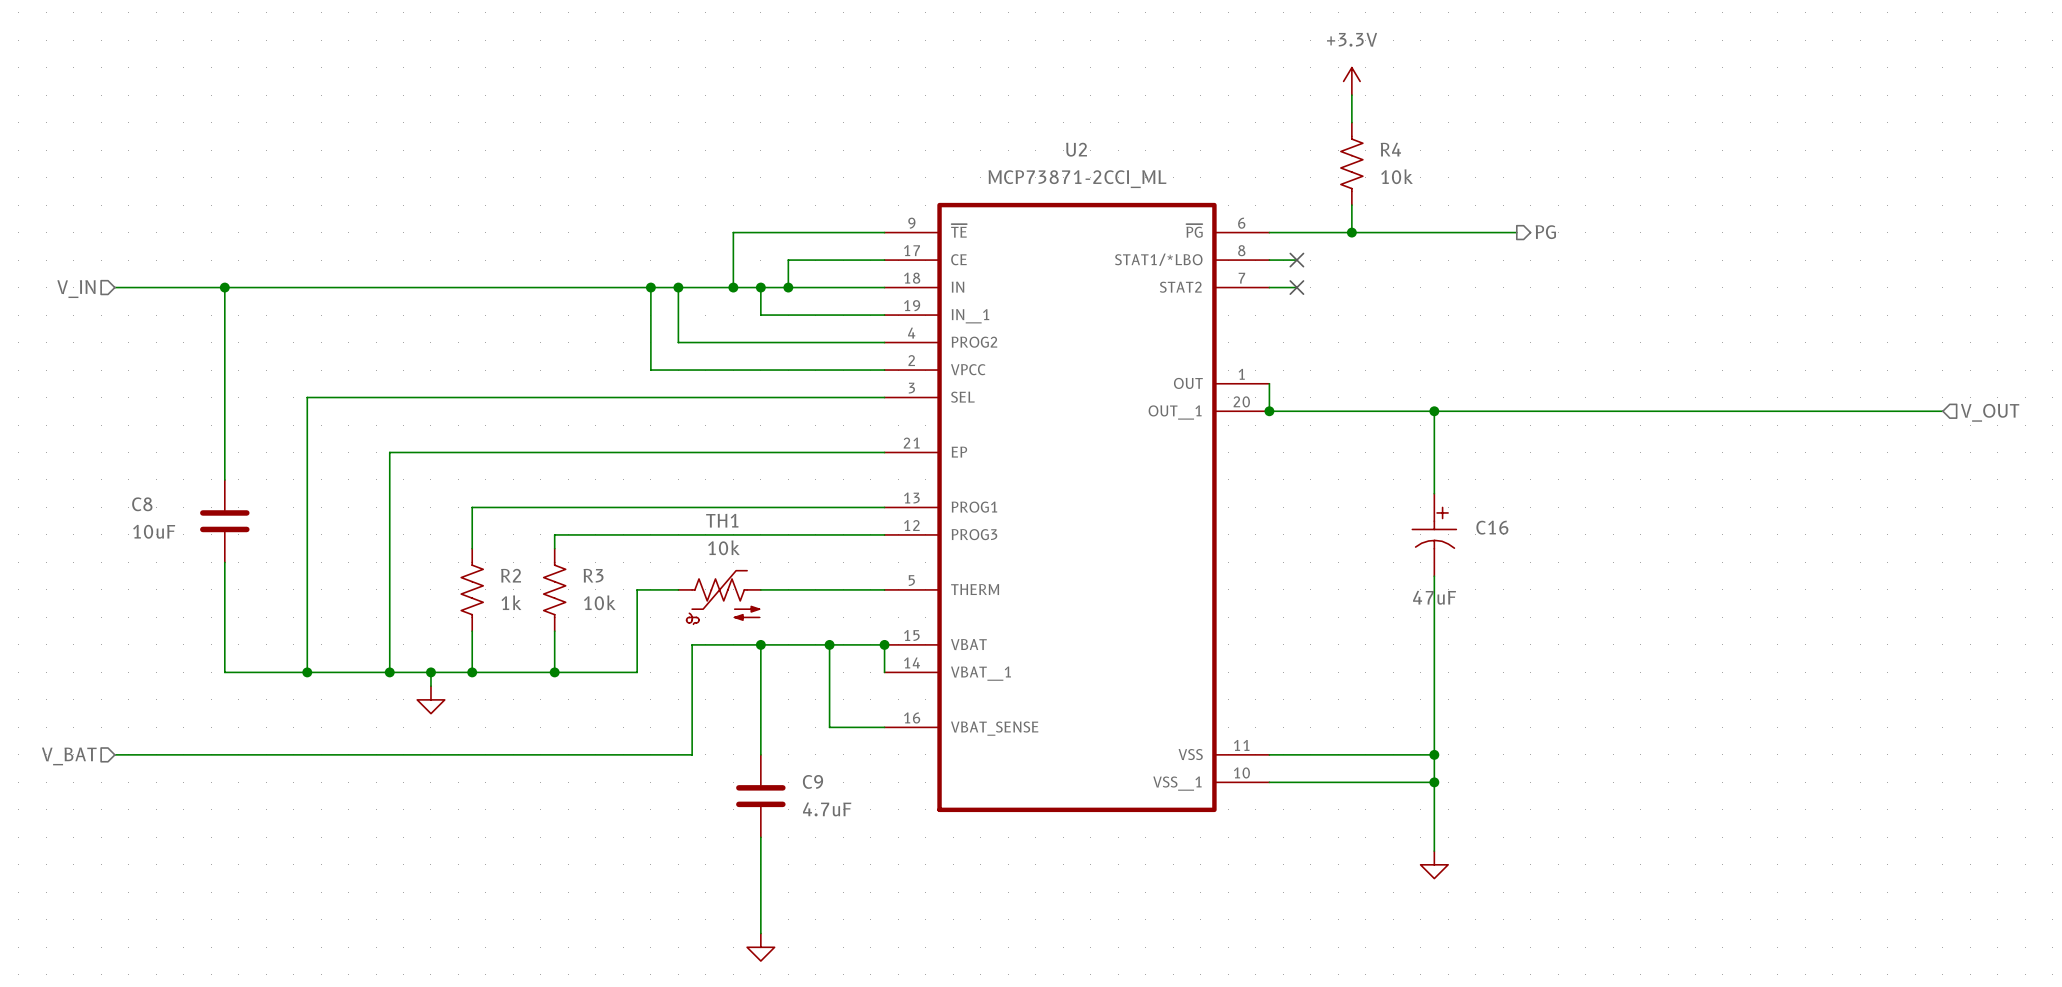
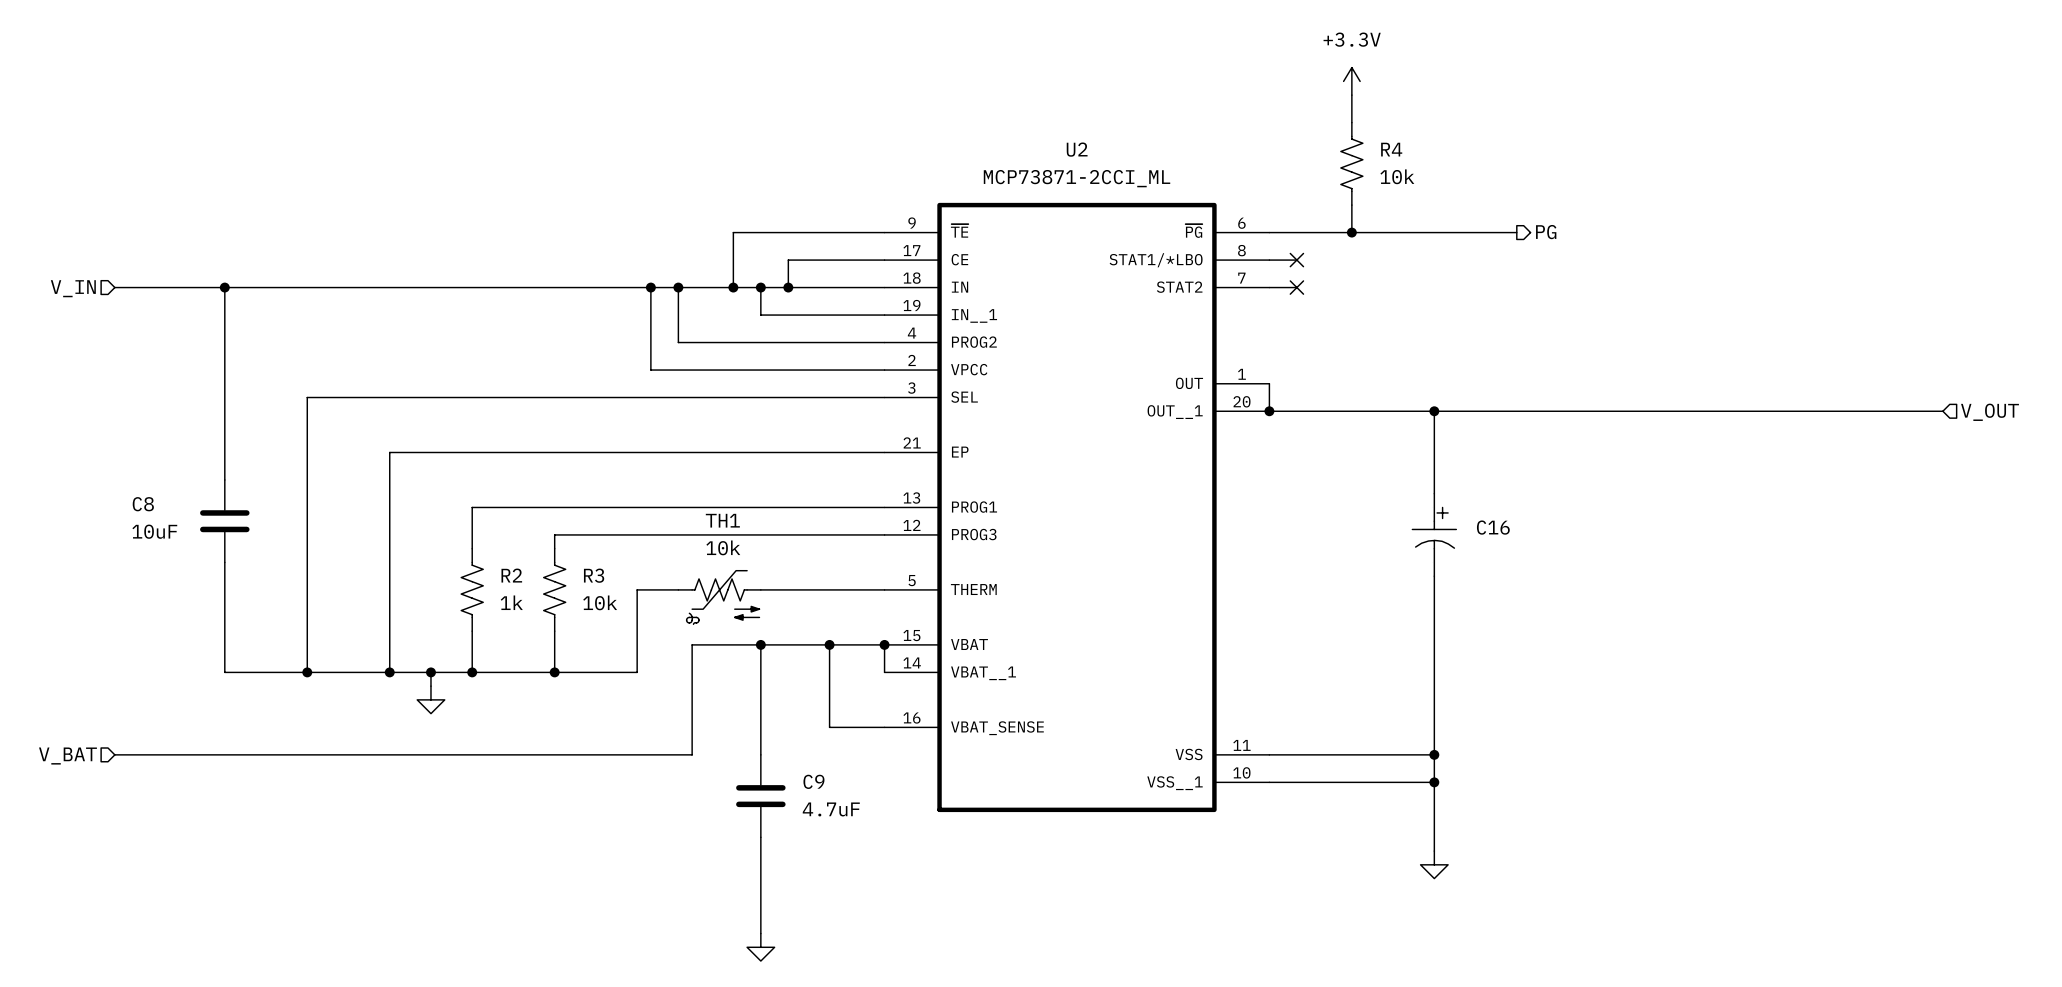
C16 value: 47uF (1434, 597) -> none

